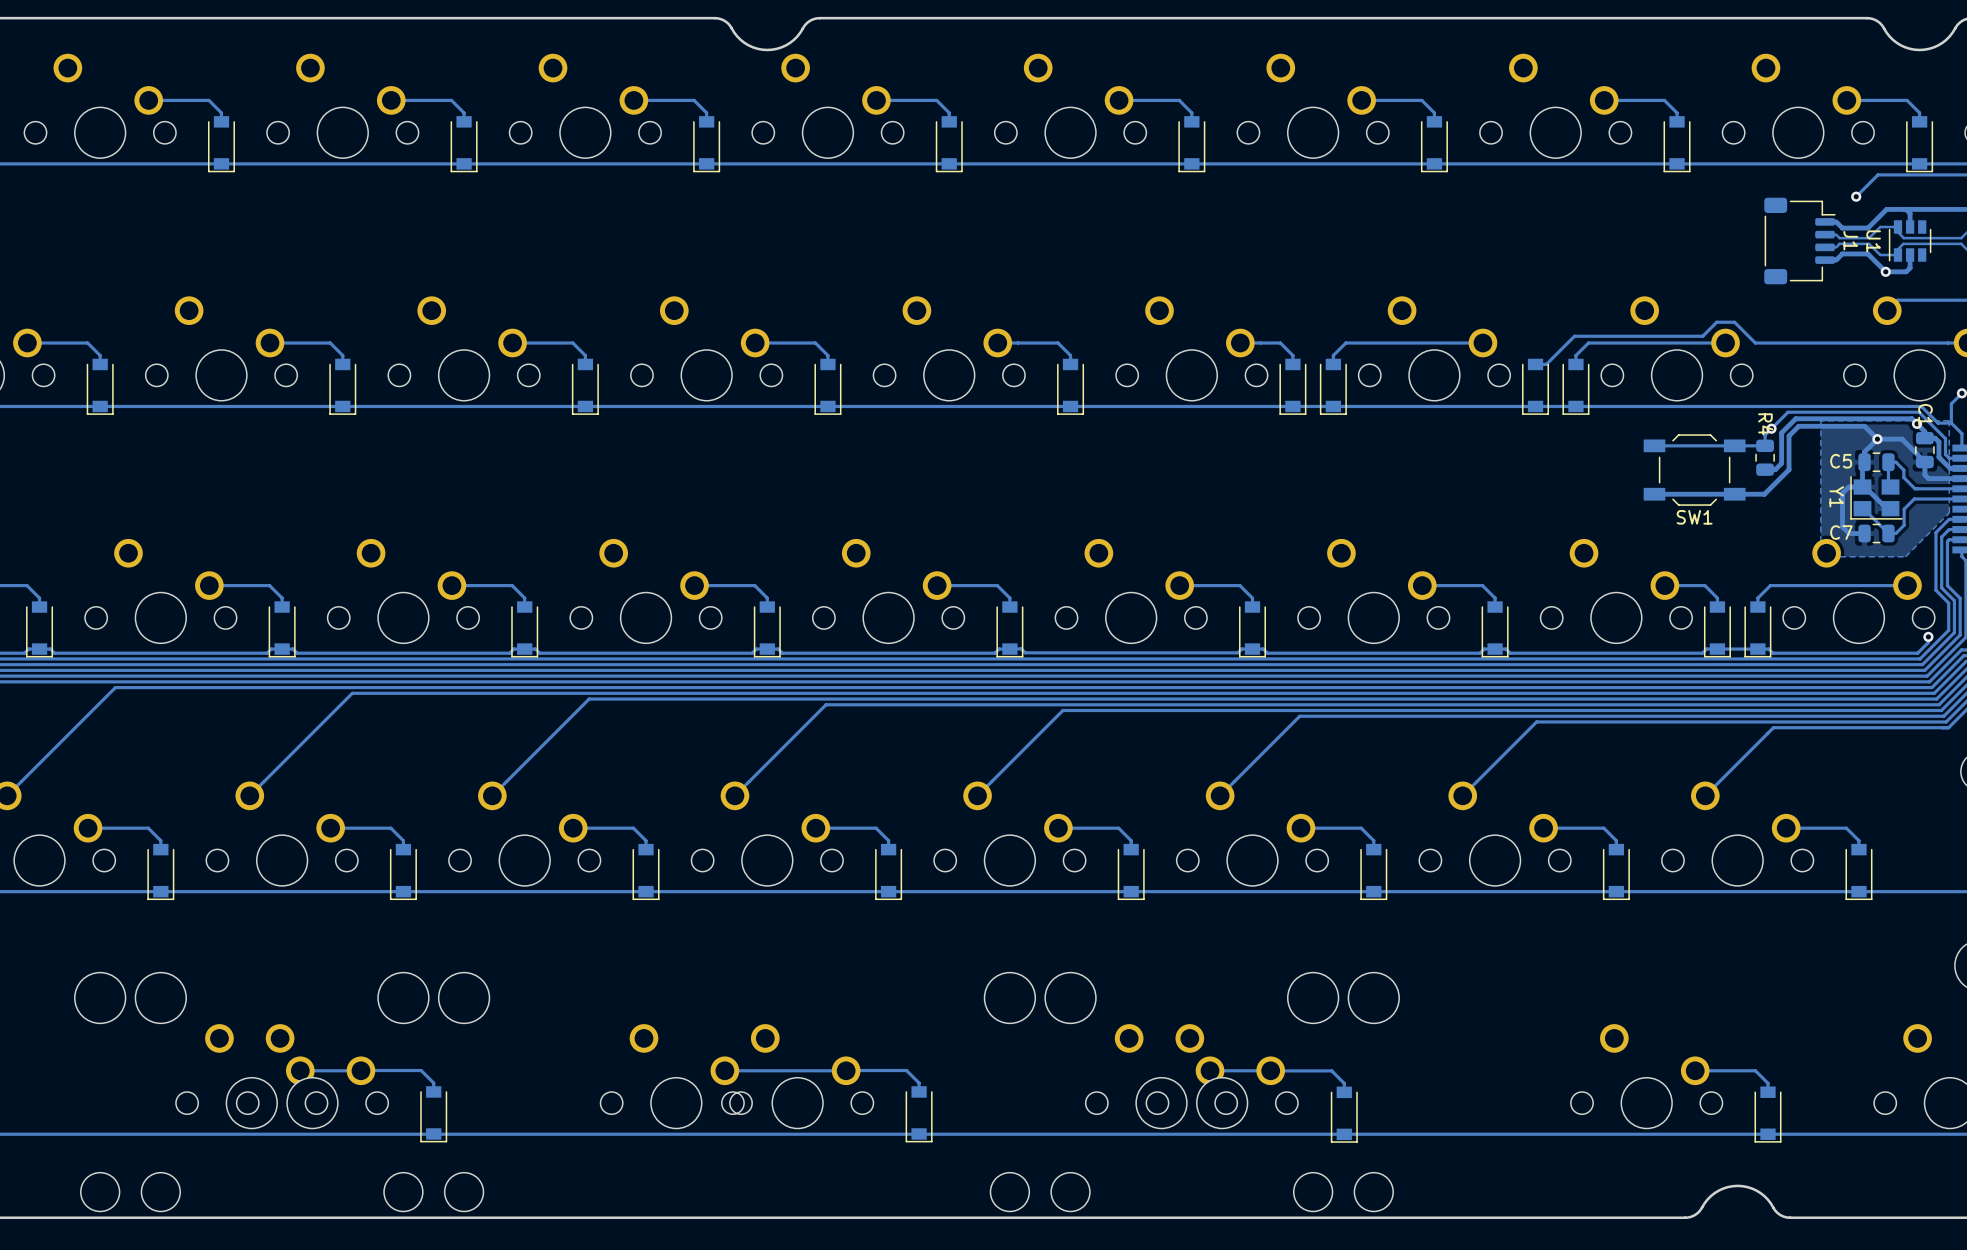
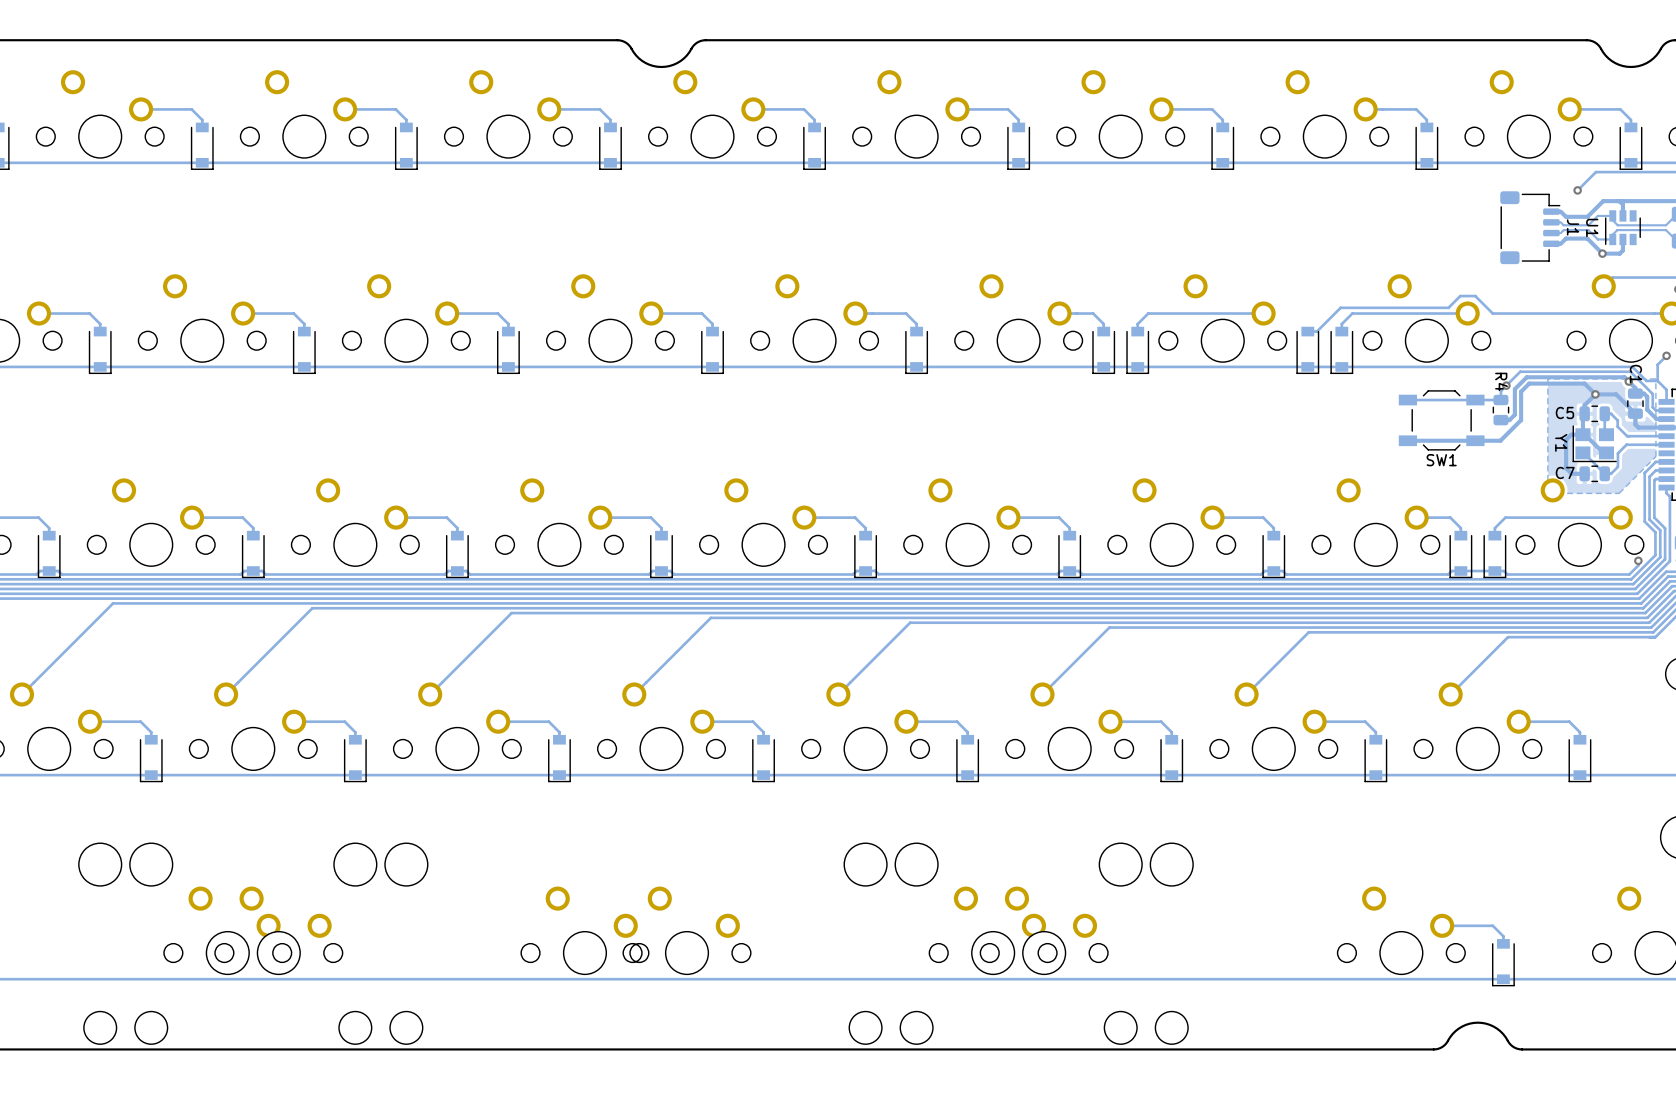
track: (360, 1070) (421, 1070) (433, 1083) (433, 1091) -> none
track: (360, 1070) (300, 1070) -> none
track: (846, 1070) (906, 1070) (919, 1083) (919, 1091) -> none
track: (846, 1070) (724, 1070) -> none
track: (1270, 1070) (1210, 1070) -> none
track: (1271, 1070) (1331, 1070) (1344, 1083) (1344, 1092) -> none
part: (433, 1114) -> none
part: (919, 1114) -> none
part: (1344, 1114) -> none

